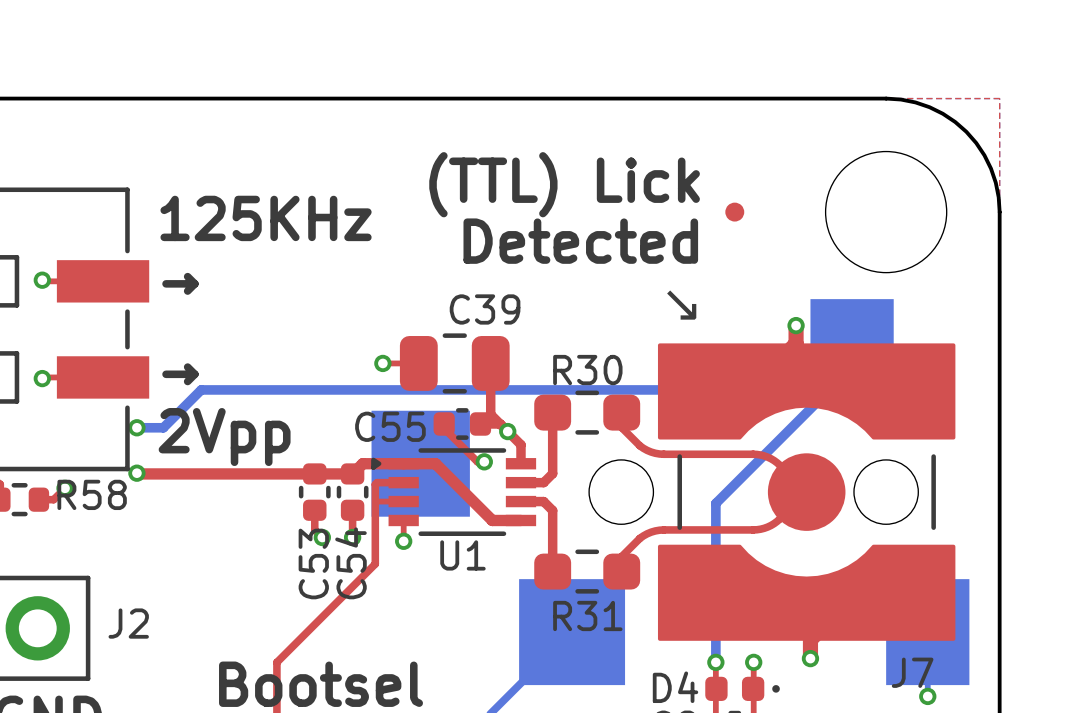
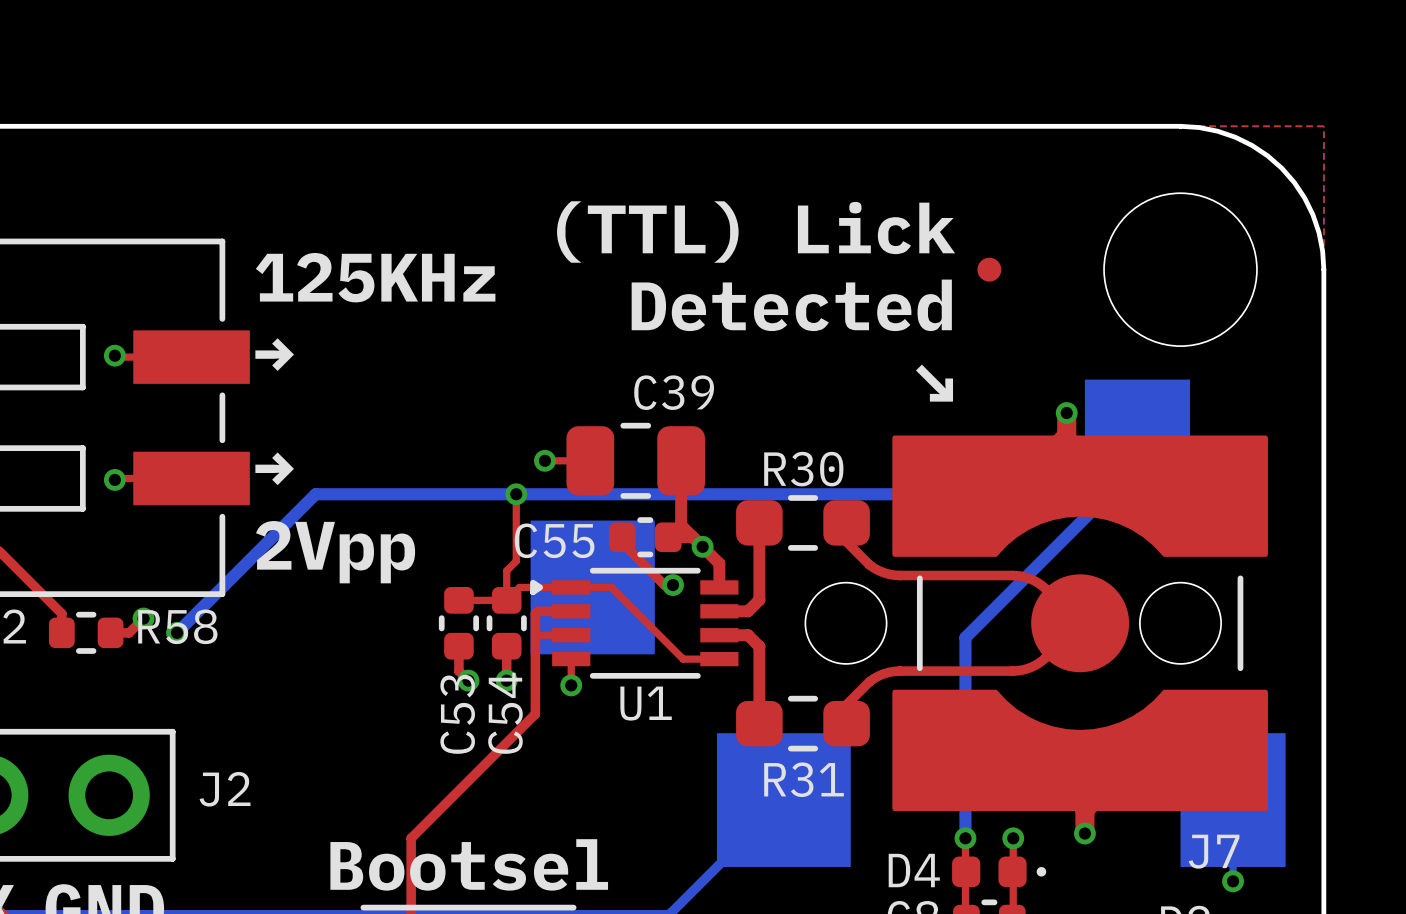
top track: none -> (516, 494) (516, 561) (506, 570) (506, 600)
via: none -> (516, 494)
bottom track: (136, 427) (163, 427) -> (176, 632) (267, 542)
via: (136, 427) -> none
top track: (136, 473) (314, 473) -> none
via: (136, 473) -> none
top track width: thick (314, 473) (352, 473) (362, 463) (435, 463) (492, 520) (520, 520) -> thin (458, 600) (506, 600) (519, 587) (611, 587) (683, 659) (719, 659)
via: none -> (176, 632)

